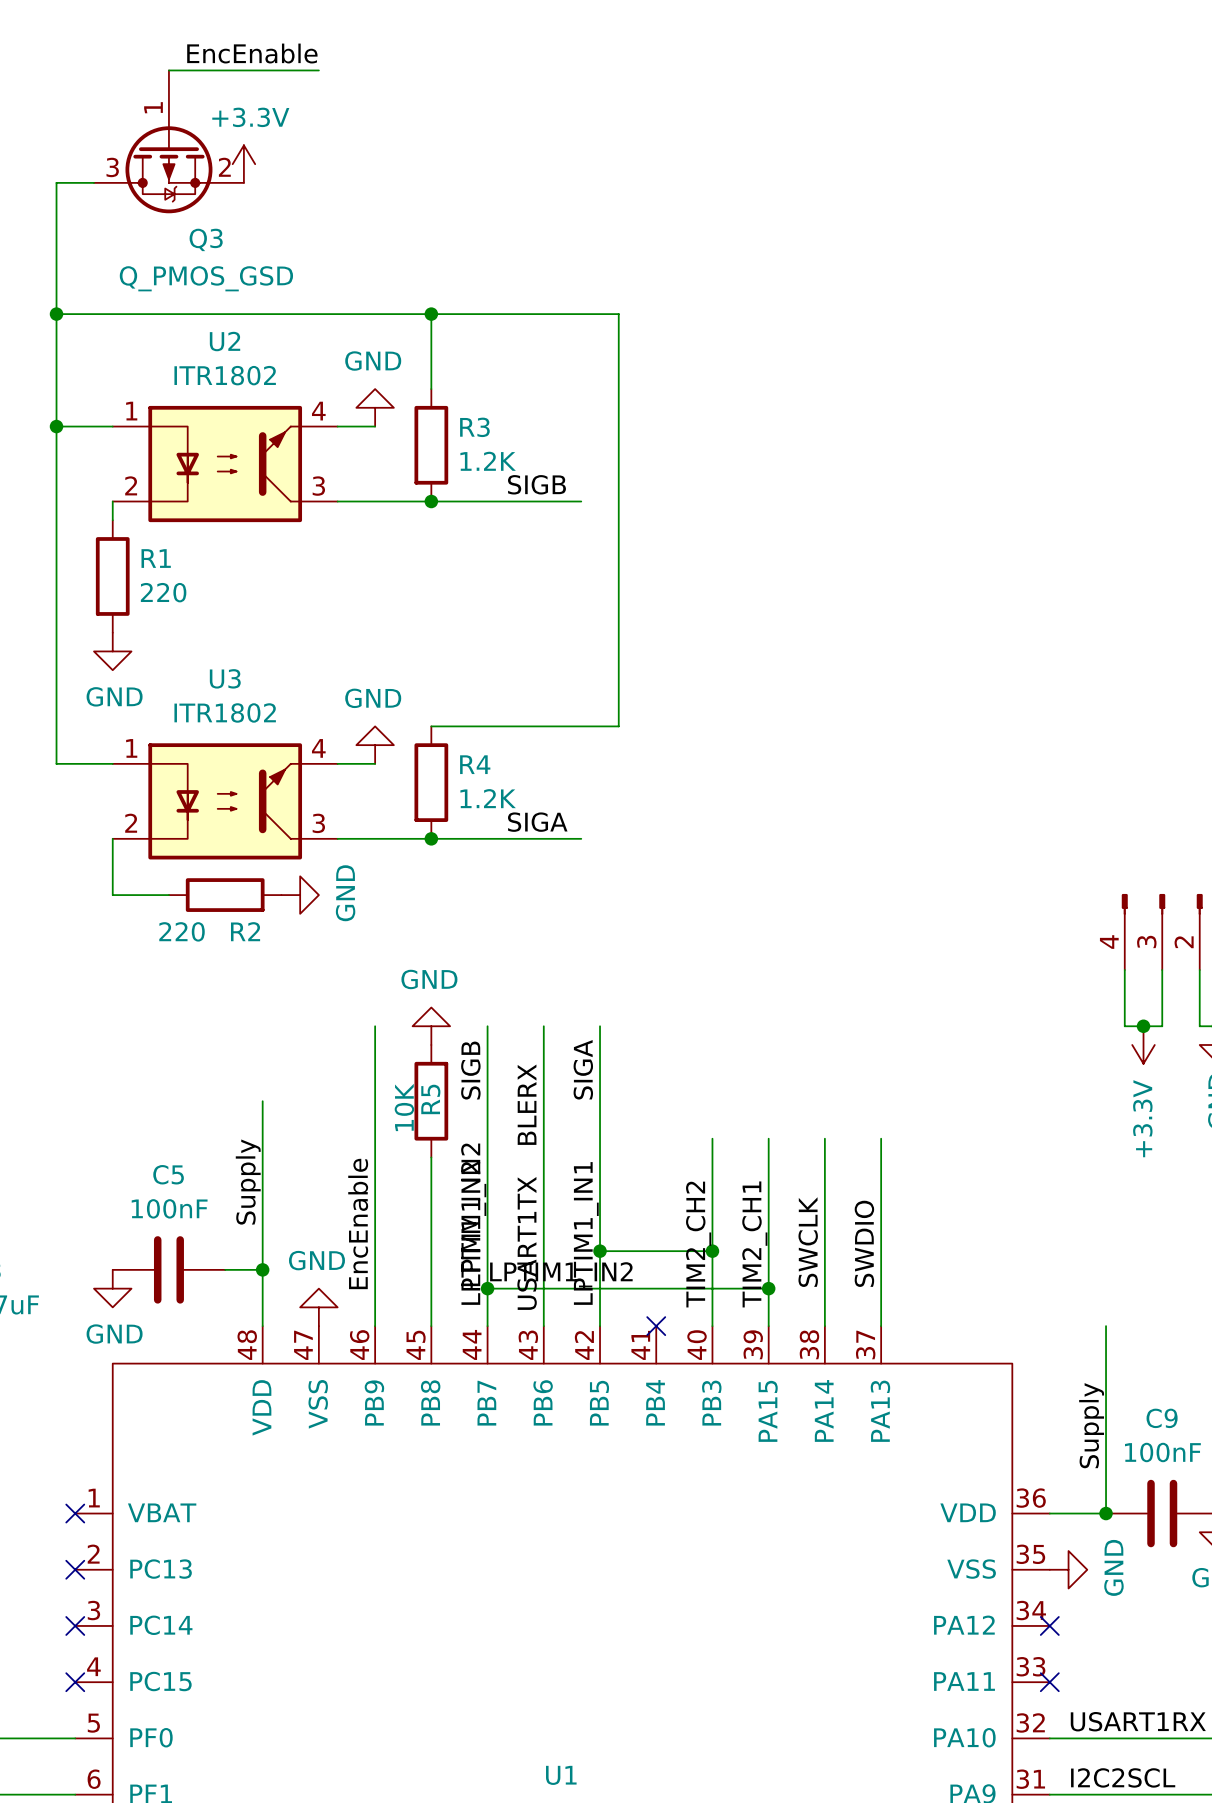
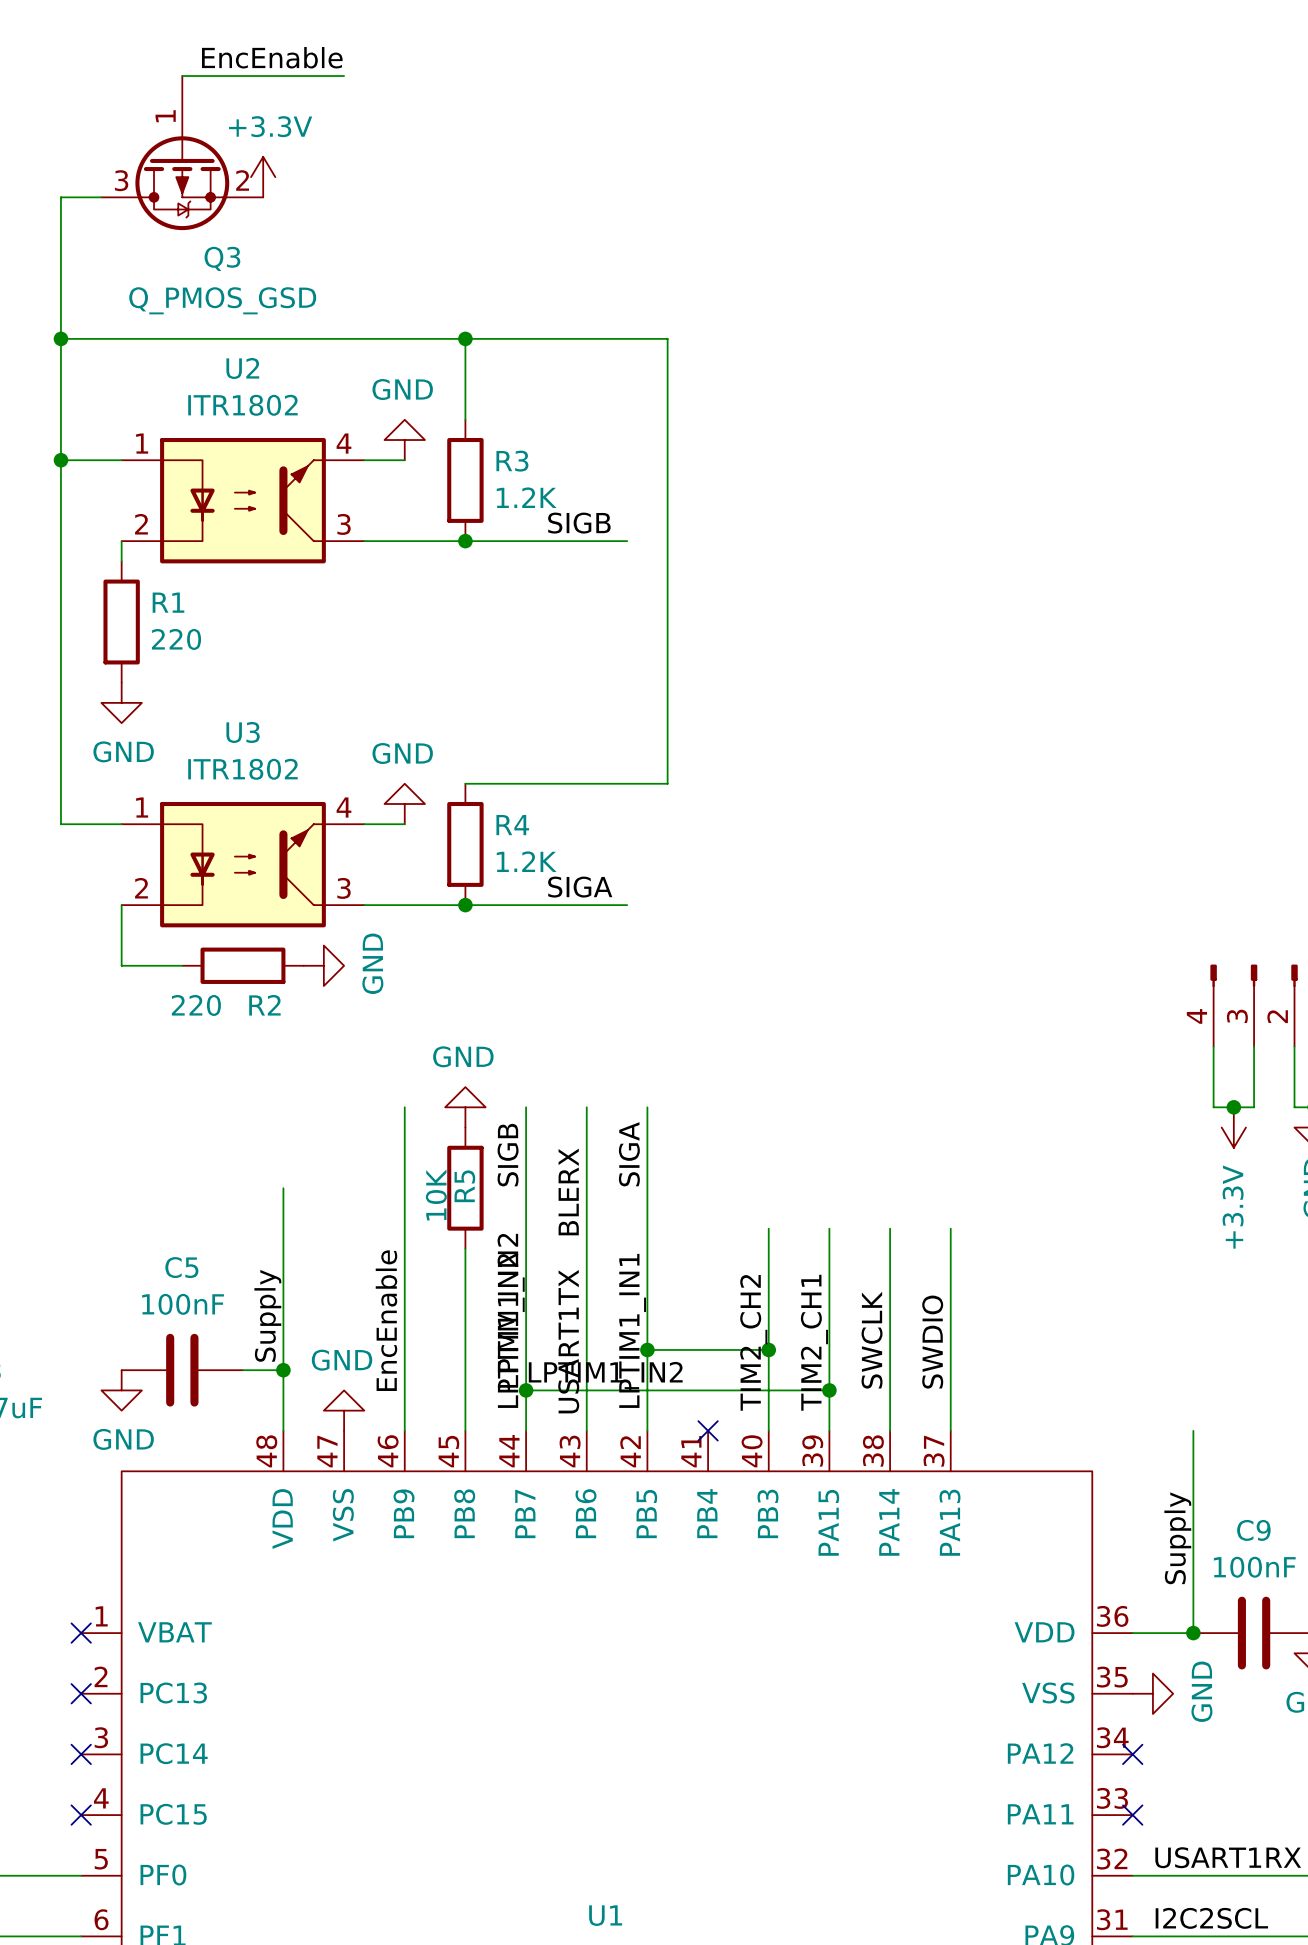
label position: Supply (248, 1182) -> Supply (267, 1315)

